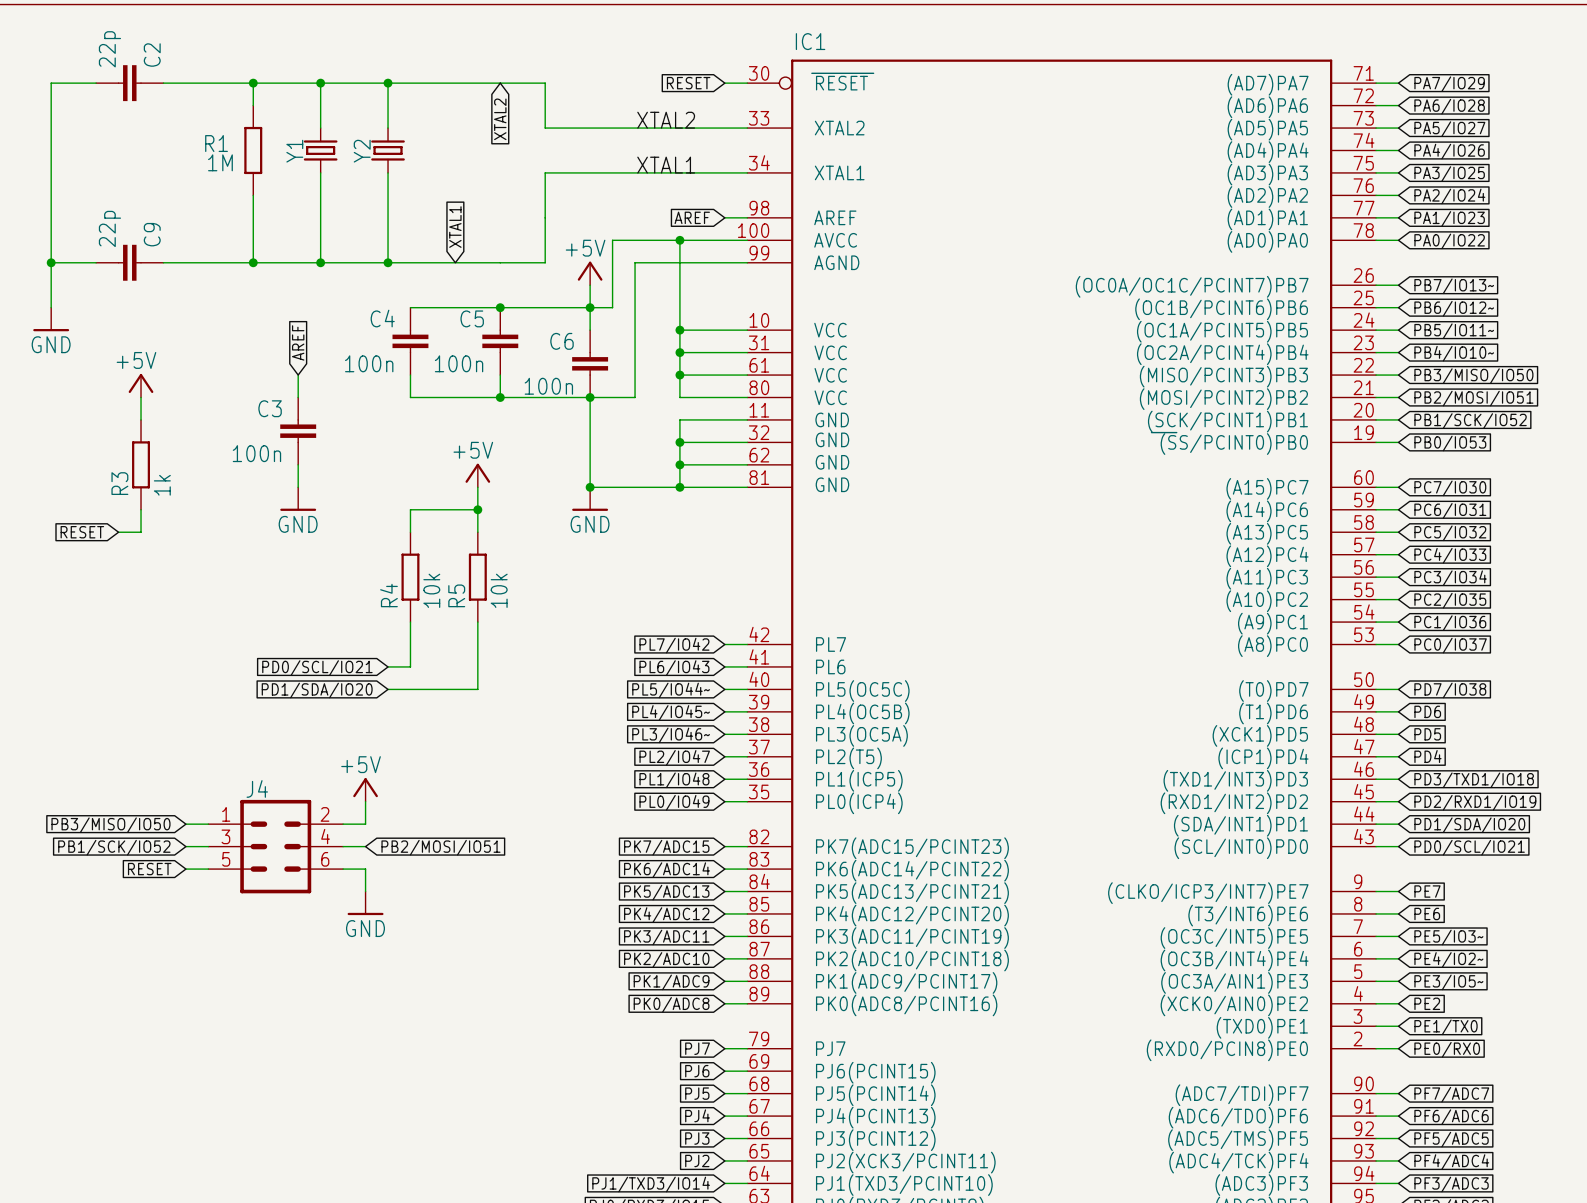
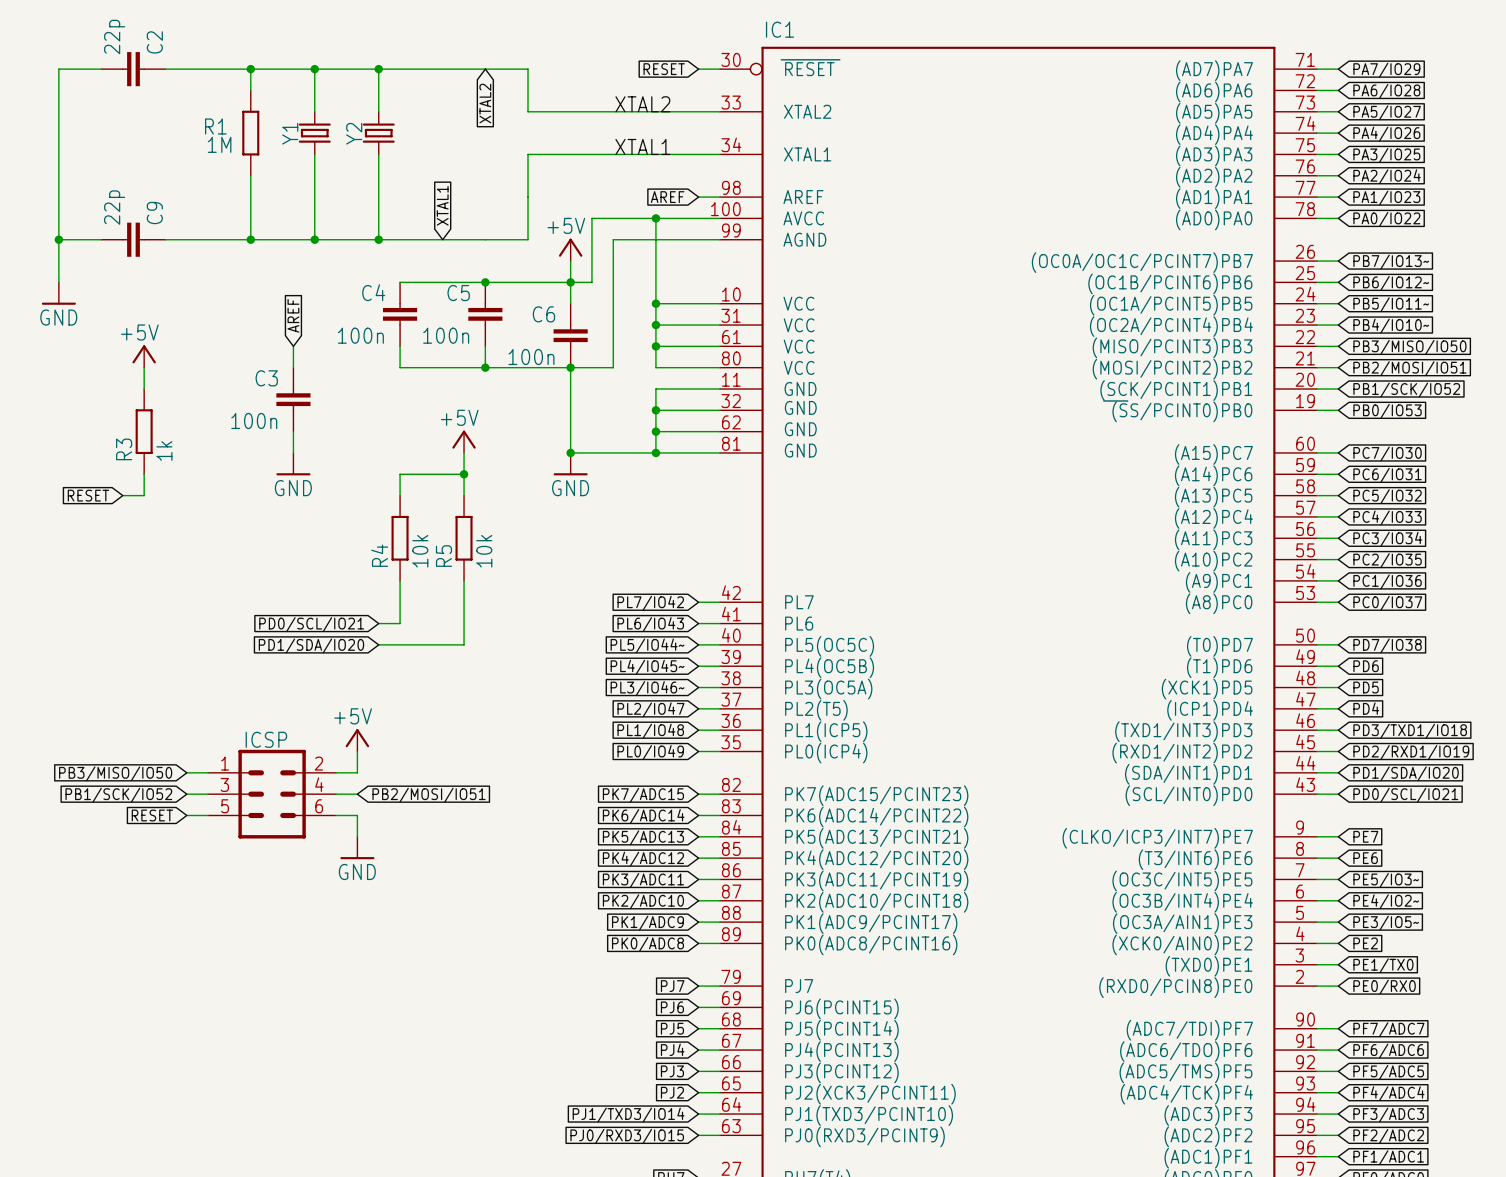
J4 name: J4 (257, 788) -> ICSP (266, 739)

